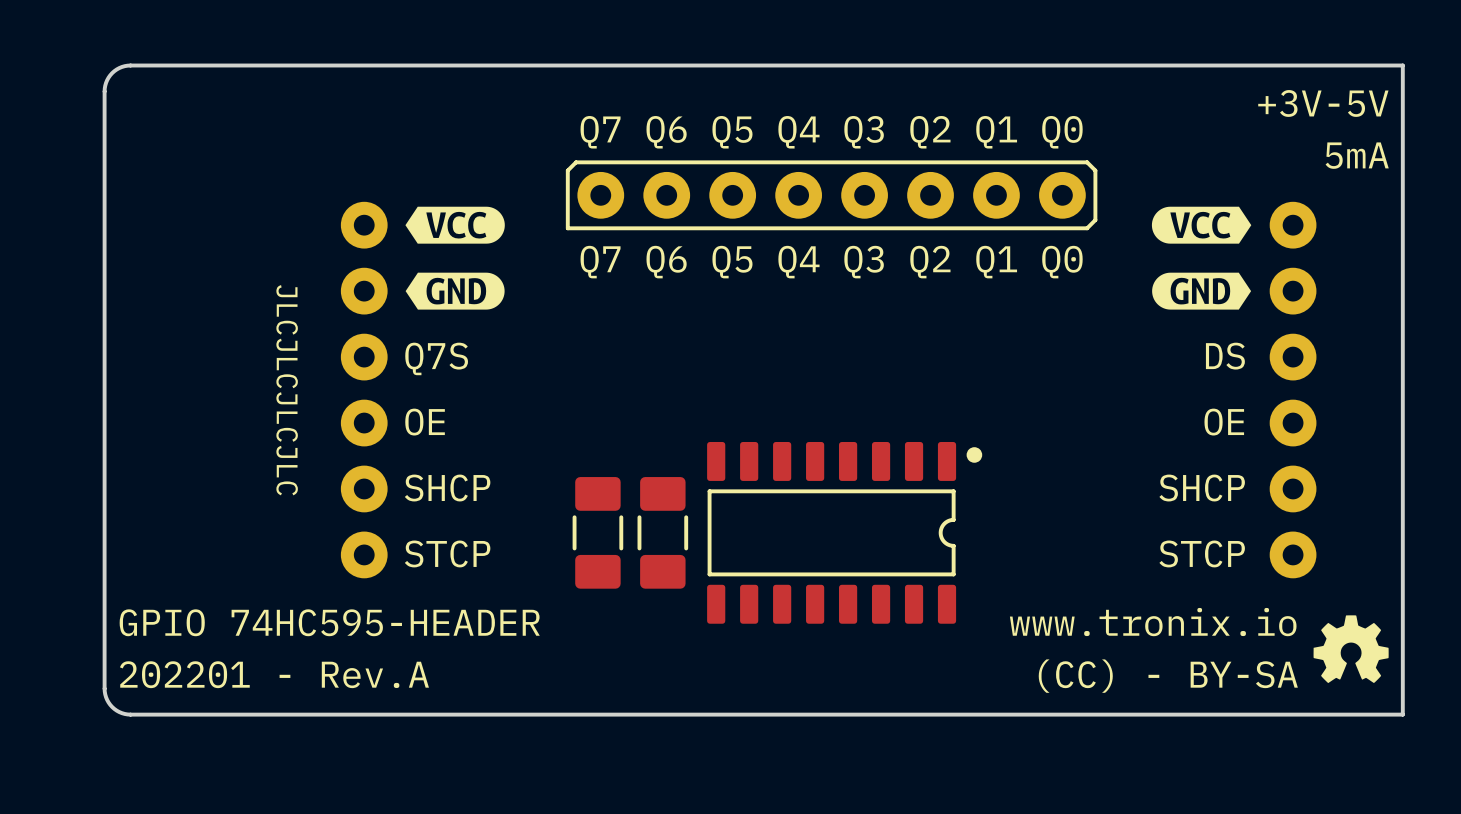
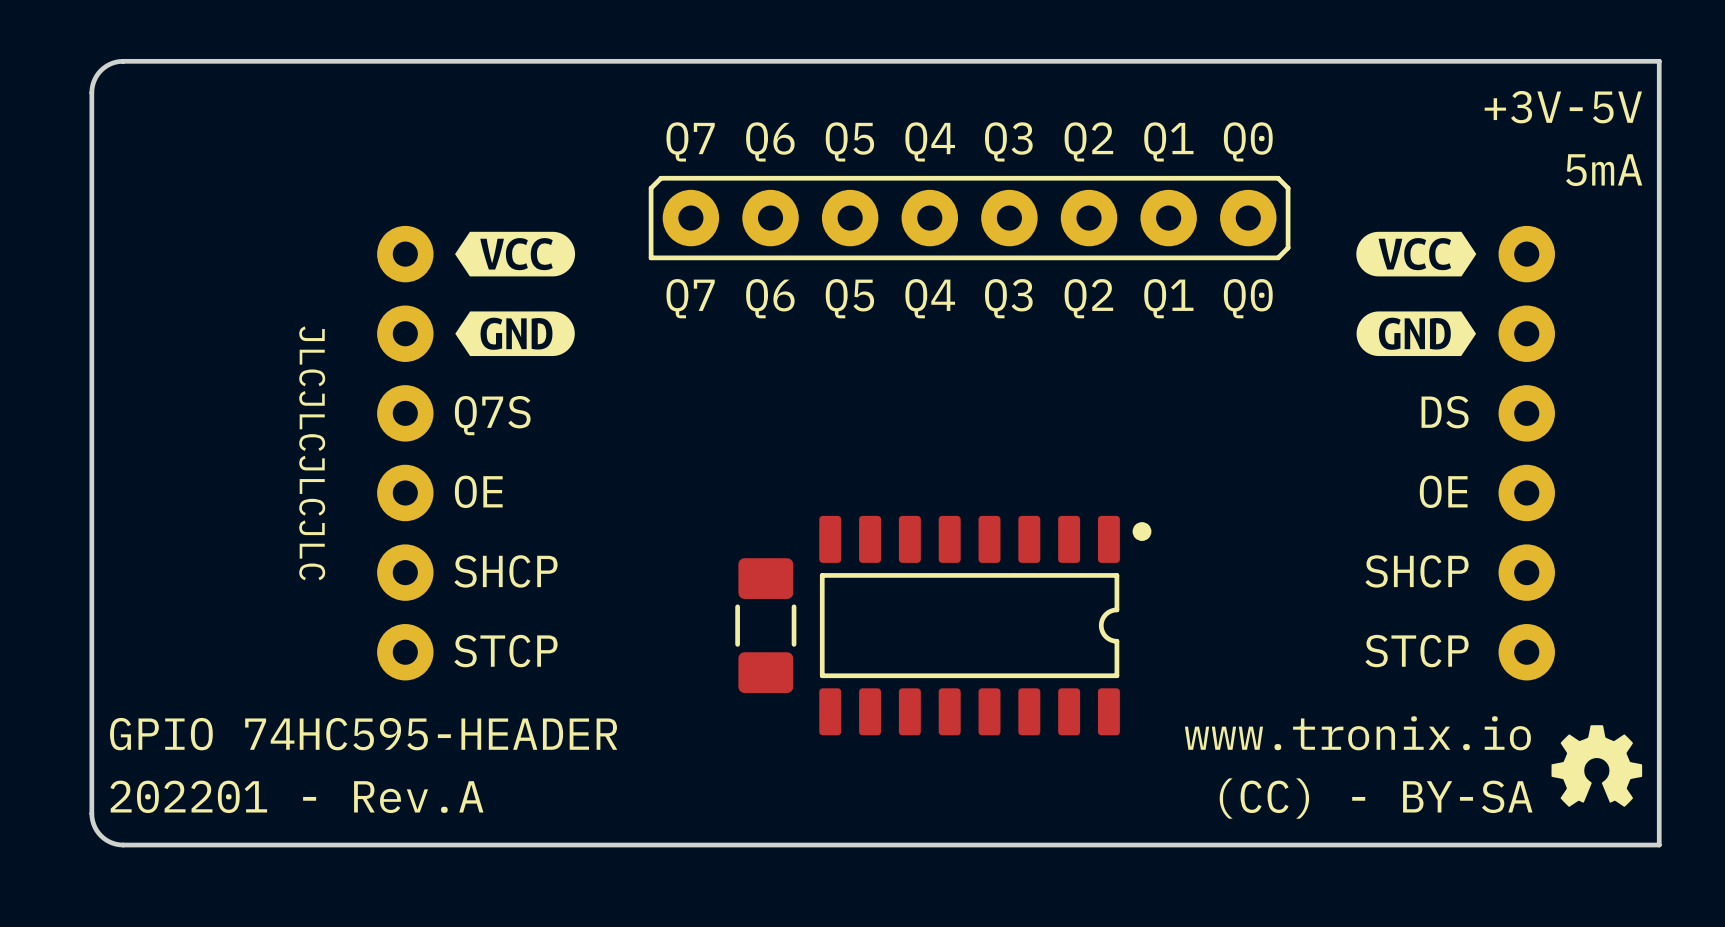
part: (597, 532) -> none

